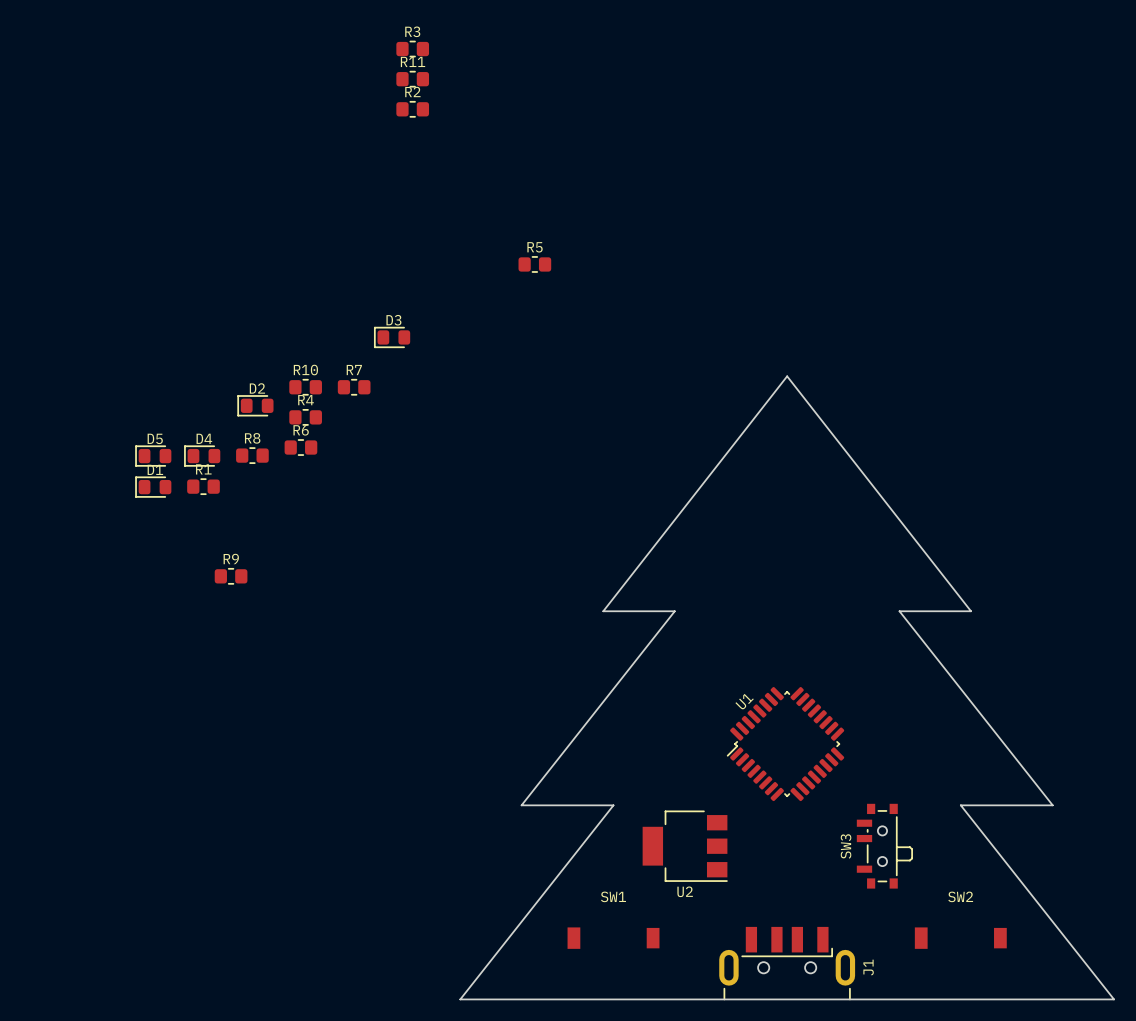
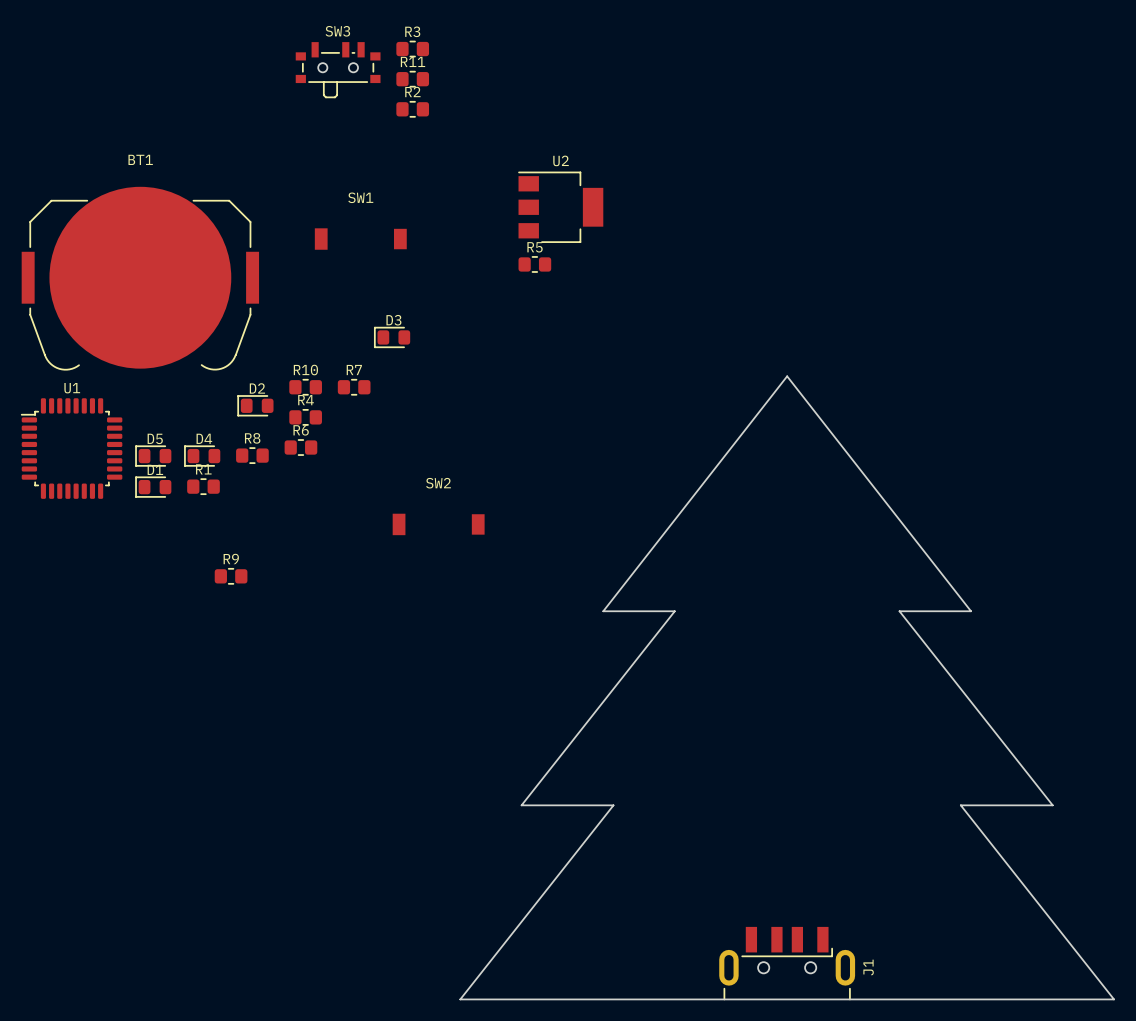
BT1: none -> (140, 278)
U1 rotation: 0° (785, 744) -> 45° clockwise (71, 448)
U1 position: (785, 744) -> (71, 448)
U2 rotation: 0° (685, 846) -> 180° (560, 207)
U2 position: (685, 846) -> (560, 207)
SW3 rotation: 0° (884, 846) -> 90° clockwise (338, 70)
SW3 position: (884, 846) -> (338, 70)
SW1 position: (613, 938) -> (360, 239)
SW2 position: (960, 938) -> (438, 524)

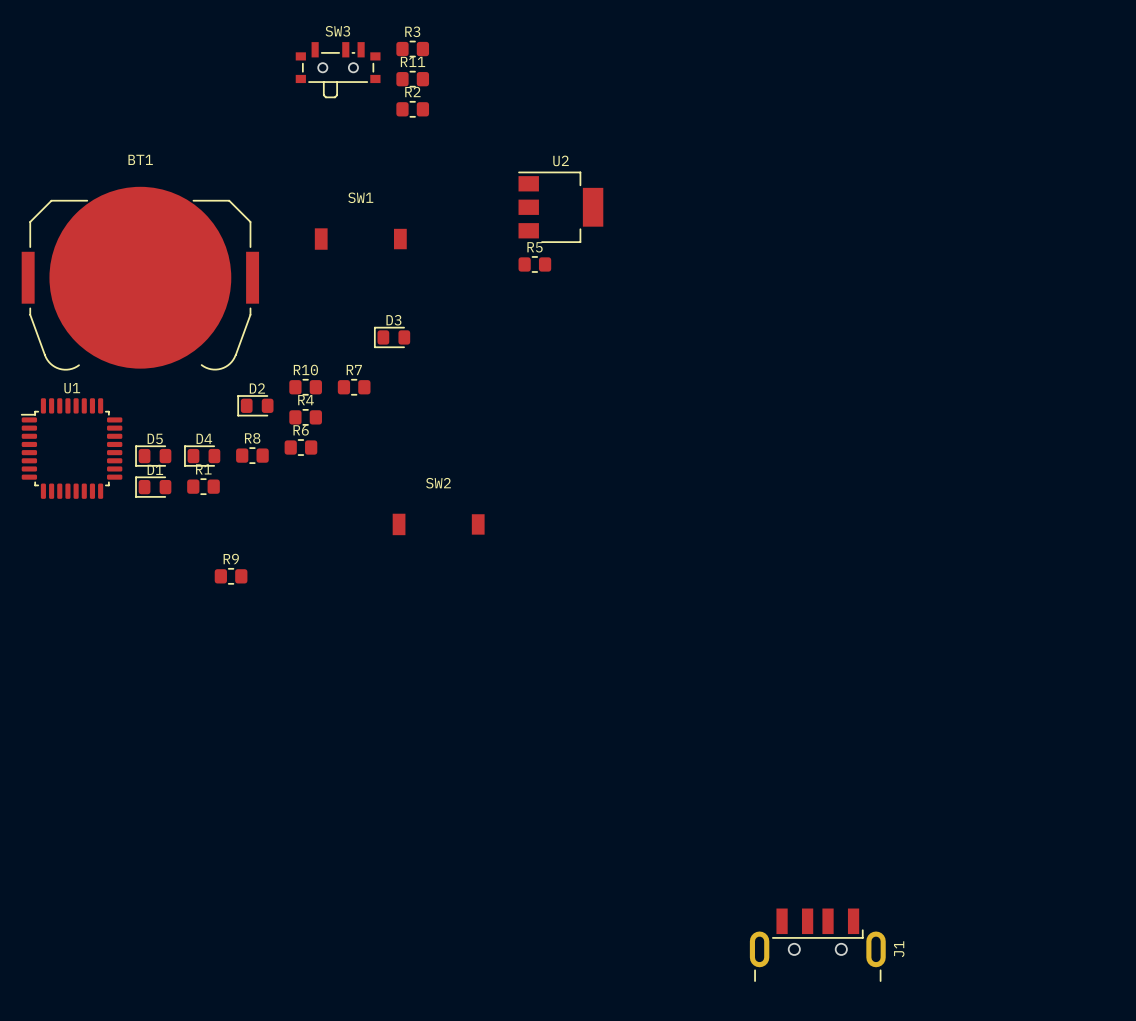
board edge: (787, 376) (971, 611) (899, 611) (1052, 805) (960, 805) (1114, 999) (460, 999) (613, 805) (521, 805) (674, 611) (603, 611) (787, 376) -> none
J1 position: (787, 963) -> (817, 945)

